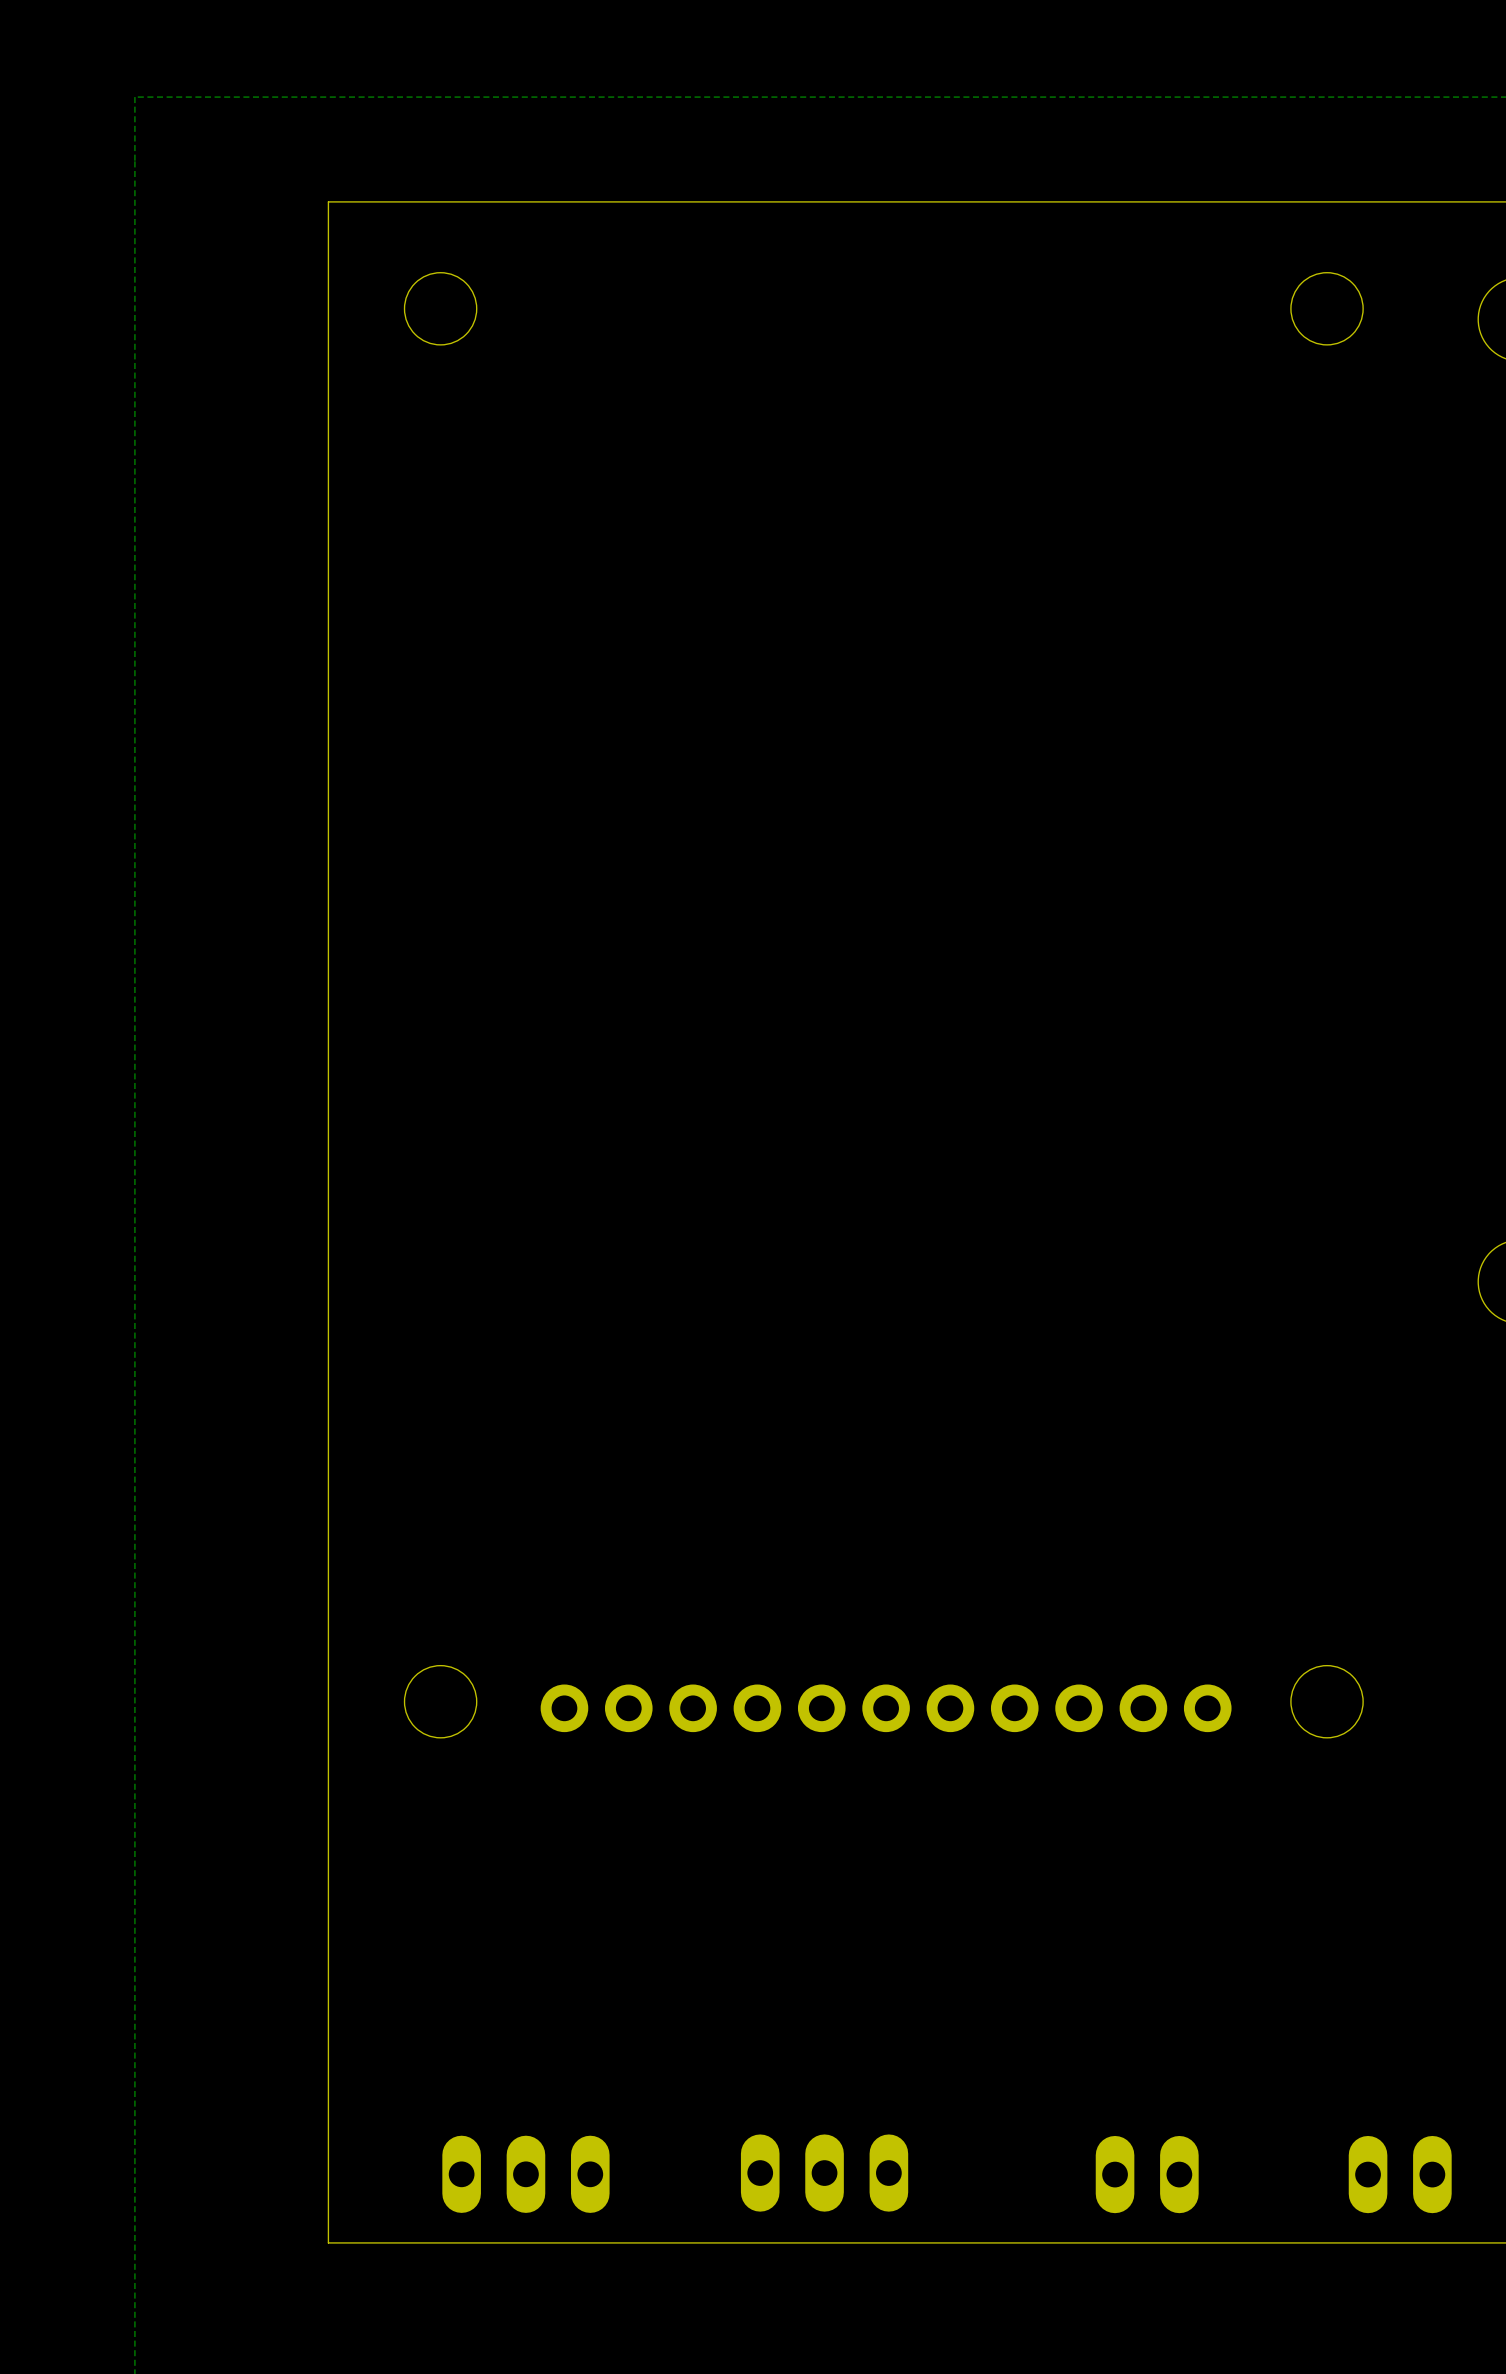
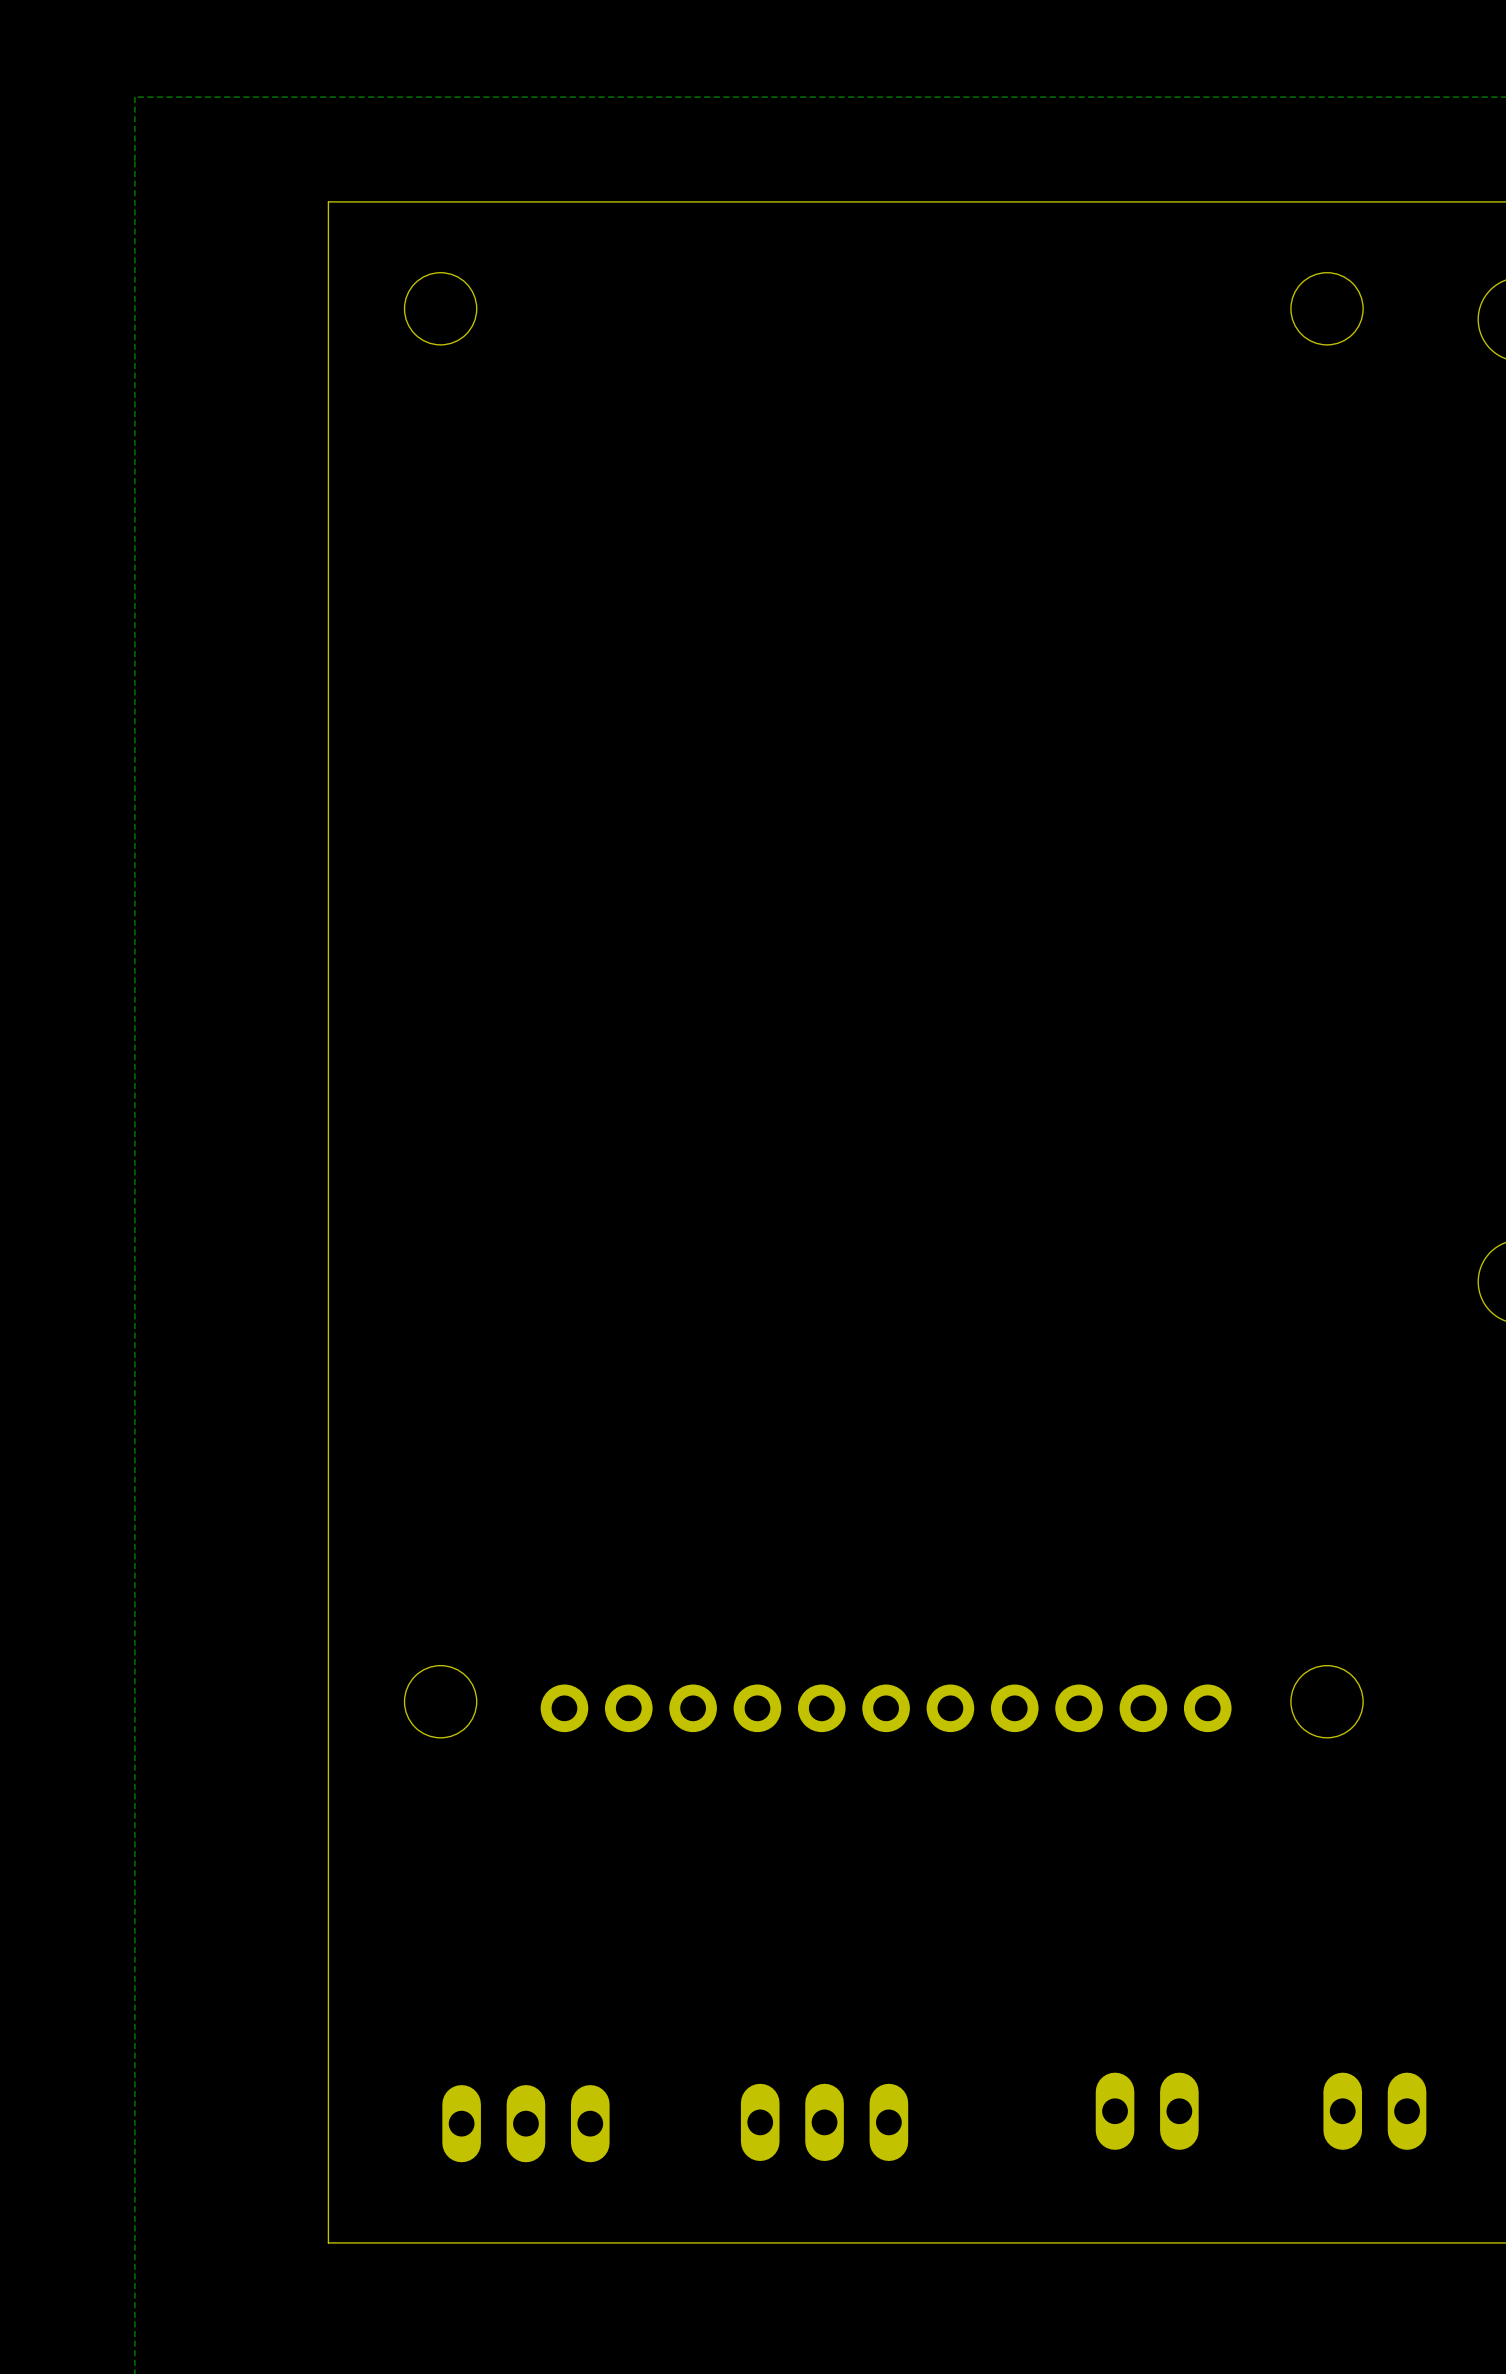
part position: (824, 2173) -> (824, 2122)
part position: (525, 2174) -> (525, 2123)
part position: (1147, 2174) -> (1147, 2111)
part position: (1400, 2174) -> (1374, 2111)

